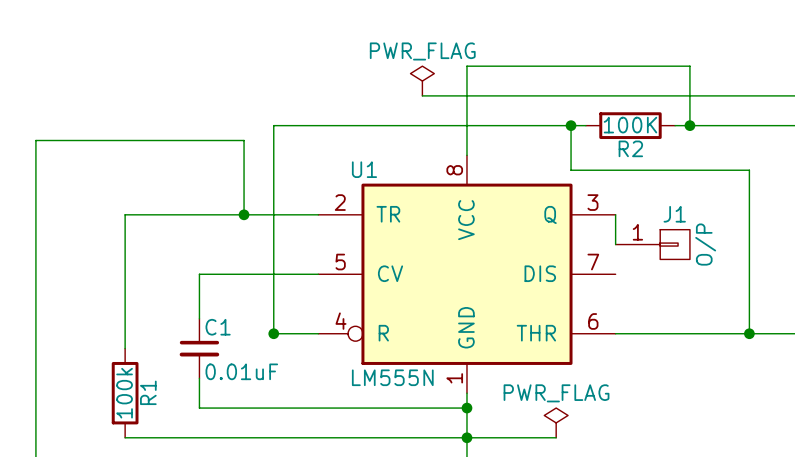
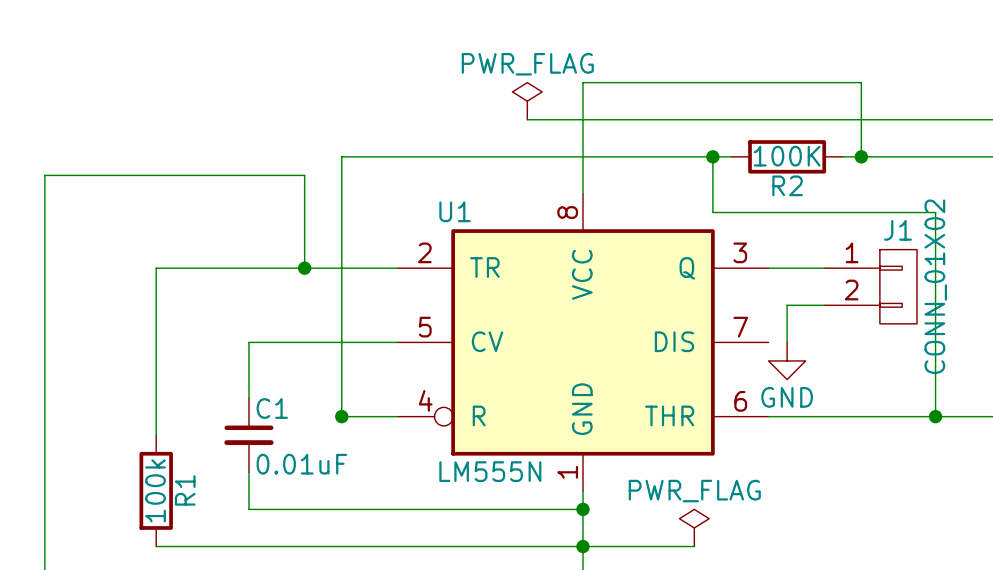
wire: (615, 214) (615, 244) -> (768, 268) (824, 268)
J1 symbol: [615, 229, 690, 260] -> [824, 249, 918, 324]
wire: none -> (824, 305) (787, 305) (787, 342)
J1 value: O/P (705, 244) -> CONN_01X02 (935, 286)
power symbol: none -> GND (787, 360)

